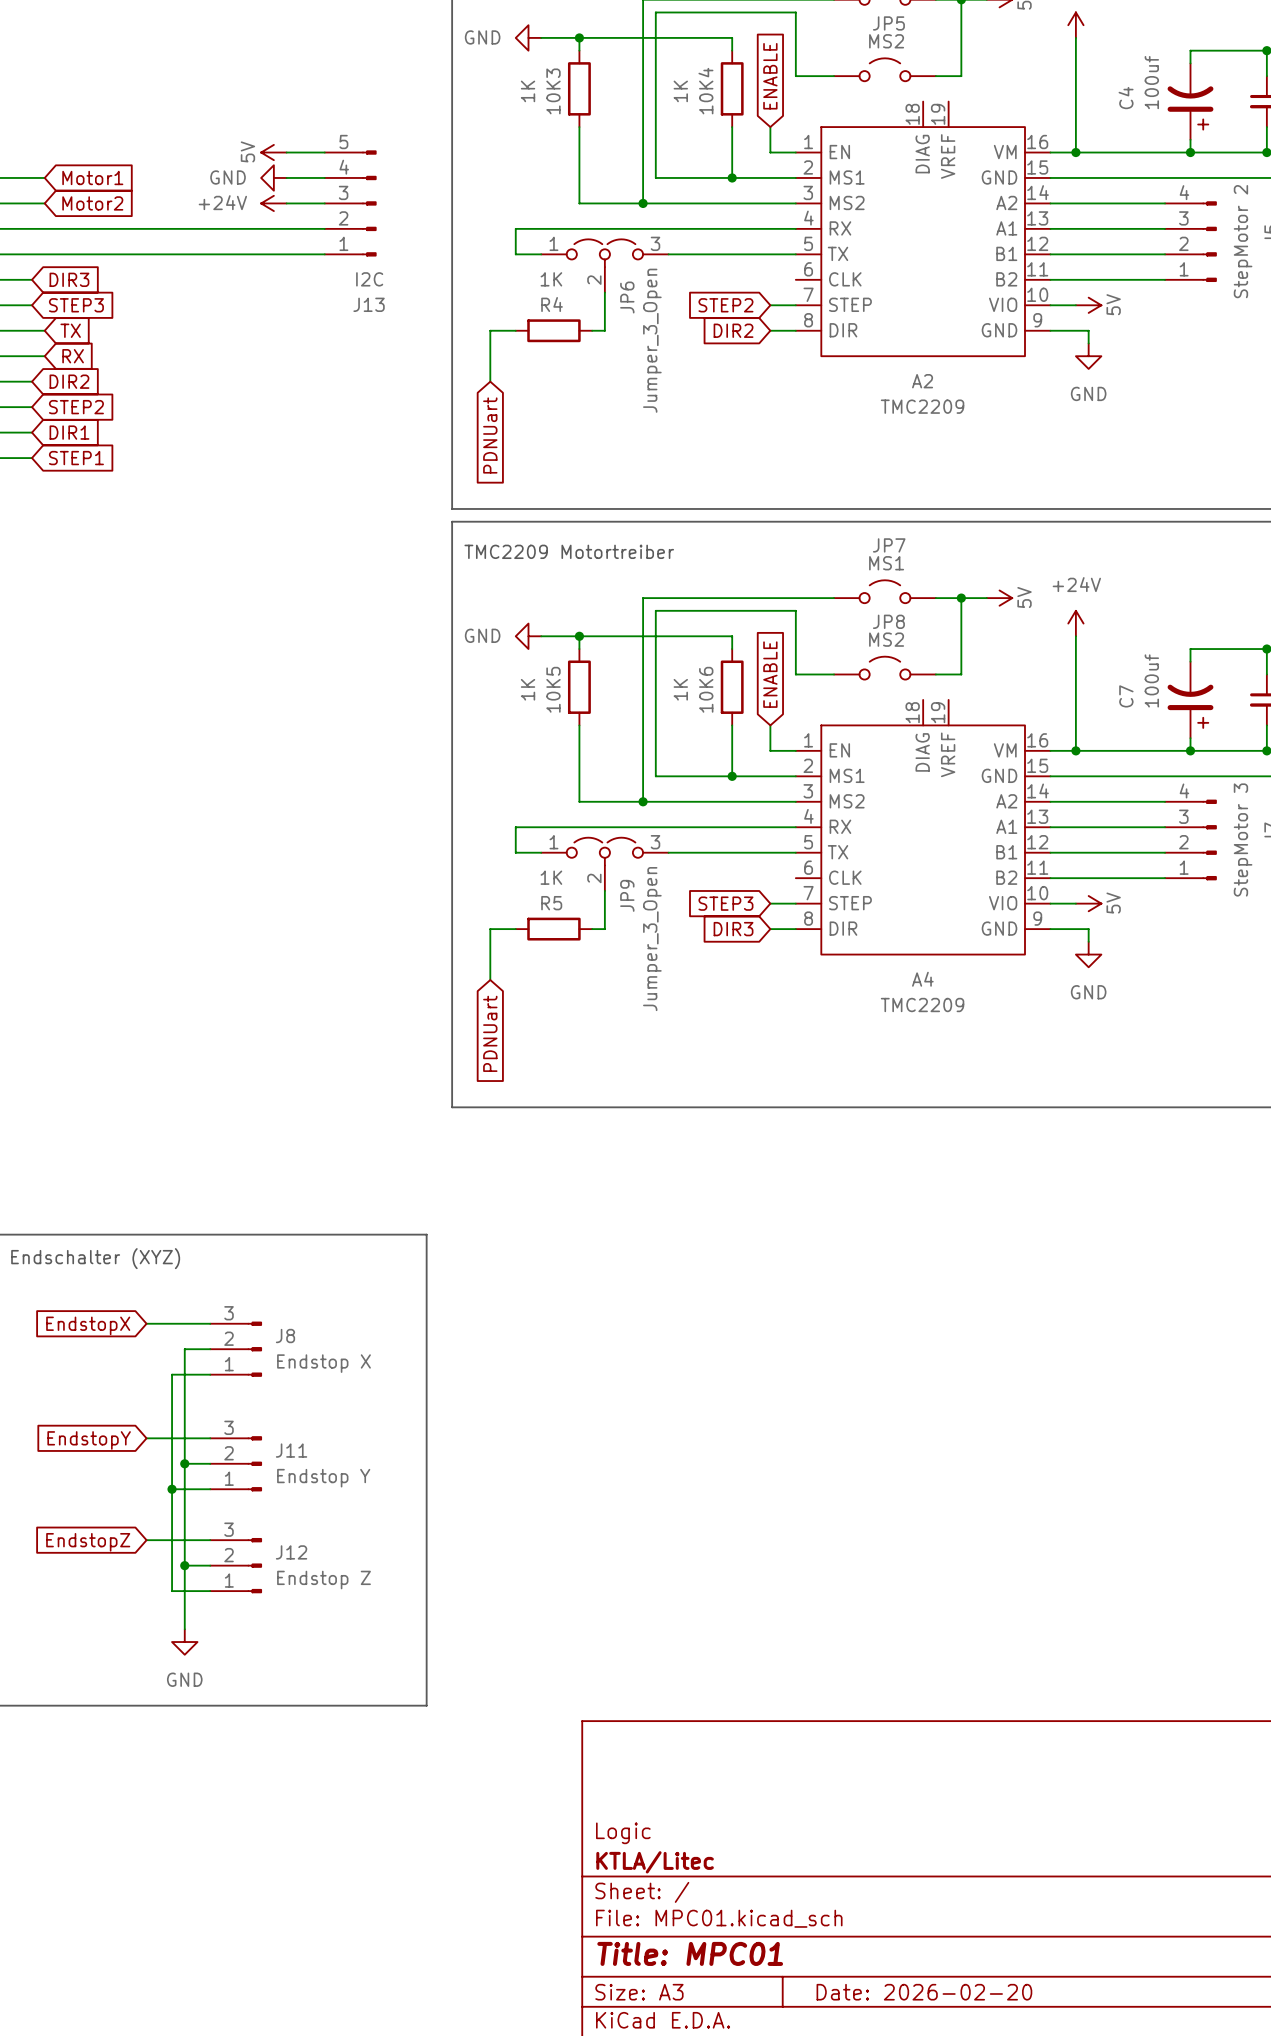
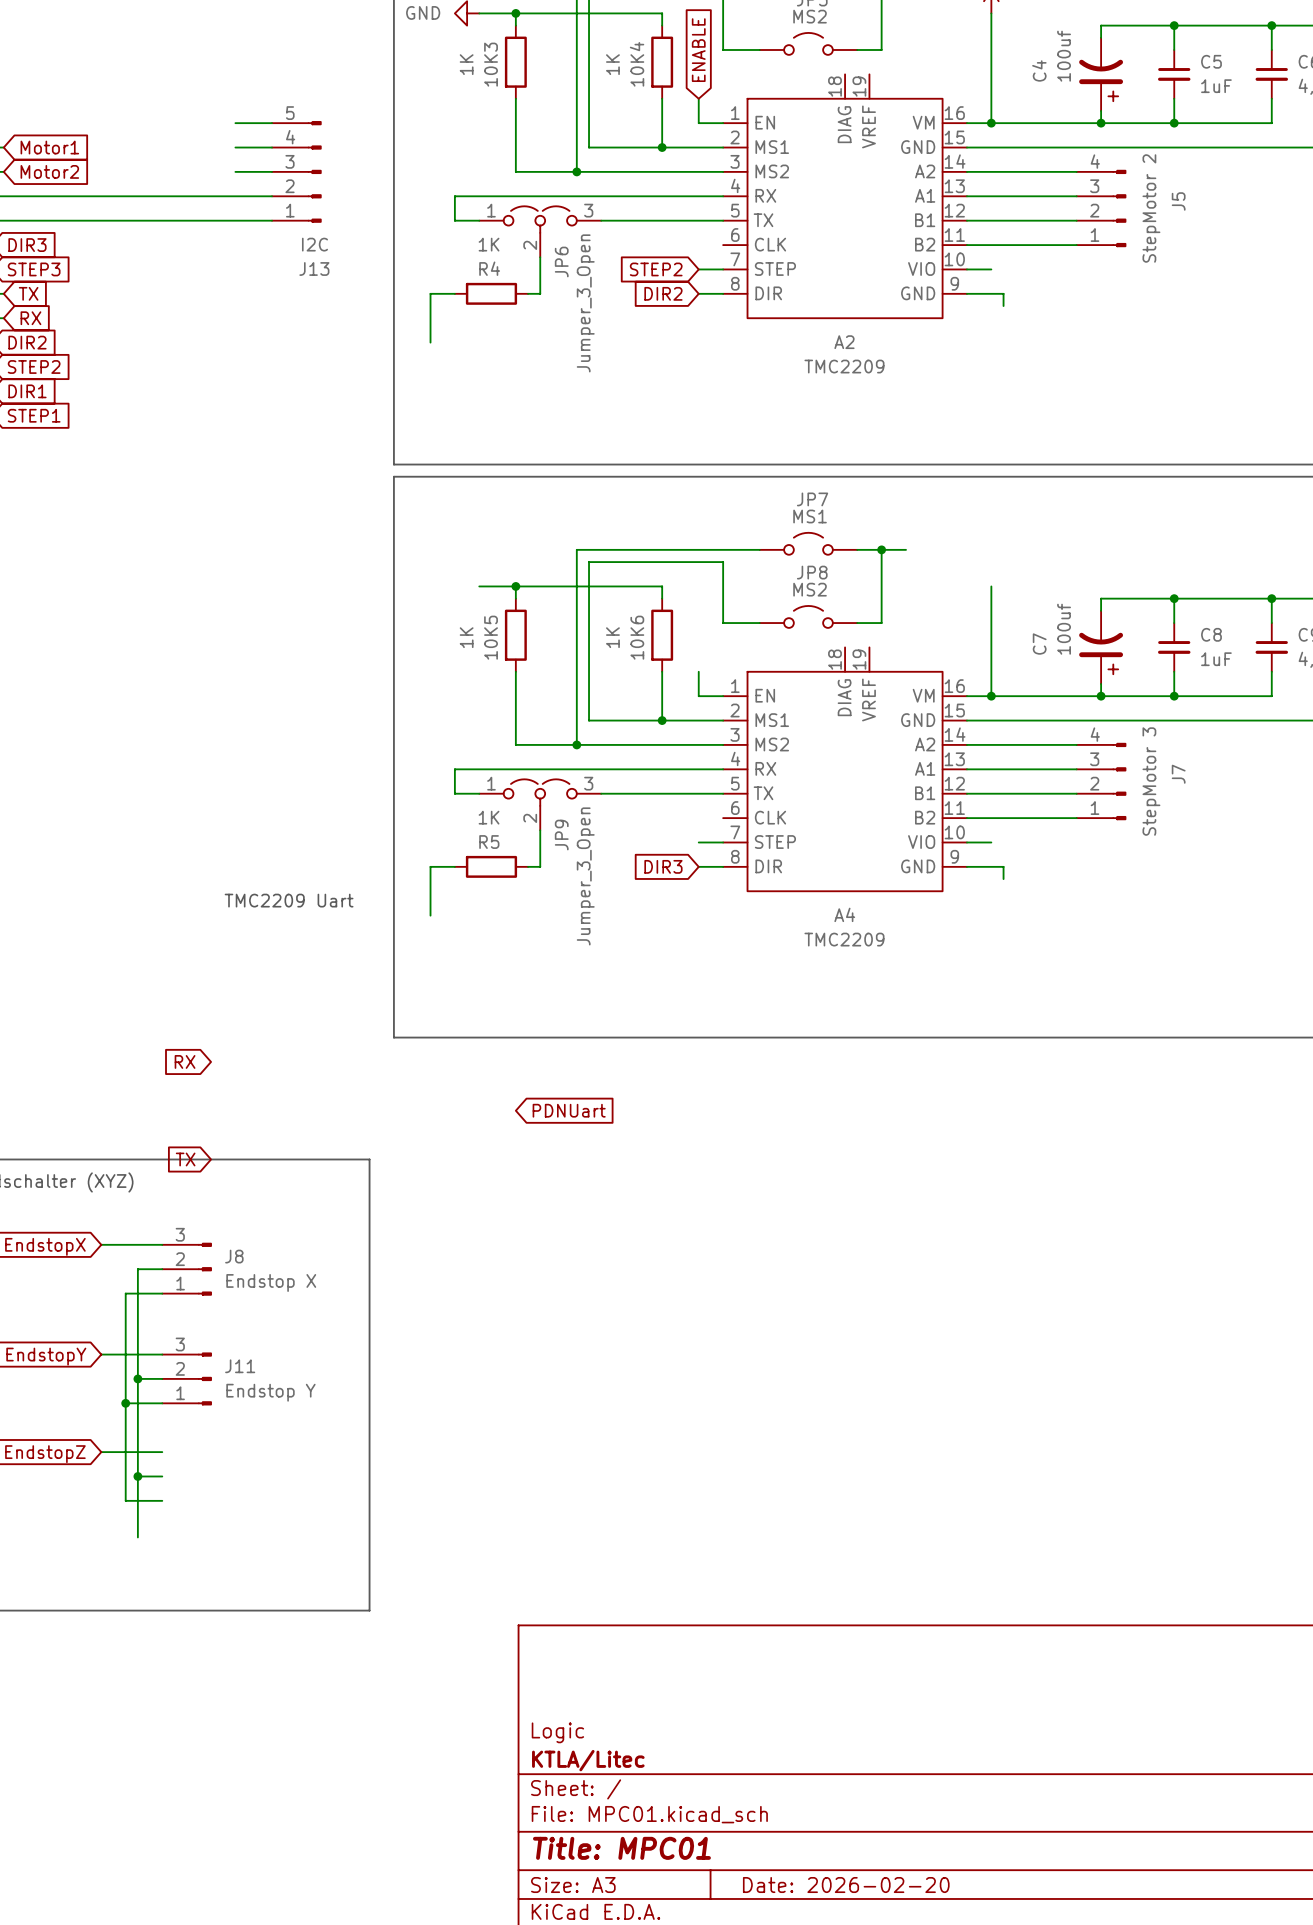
power symbol: 5V (273, 152) -> none
power symbol: GND (273, 177) -> none
power symbol: +24V (273, 203) -> none
power symbol: 5V (1088, 305) -> none
power symbol: GND (1088, 356) -> none
global label: PDNUart (490, 435) -> none
text: TMC2209 Motortreiber (569, 551) -> none
power symbol: 5V (999, 598) -> none
power symbol: +24V (1075, 623) -> none
power symbol: GND (528, 636) -> none
global label: ENABLE (770, 674) -> none
global label: STEP3 (725, 903) -> none
power symbol: 5V (1088, 903) -> none
power symbol: GND (1088, 954) -> none
text: none -> TMC2209 Uart (289, 900)
global label rotation: 0° (490, 1033) -> 90° counterclockwise (569, 1110)
global label position: PDNUart (490, 1033) -> PDNUart (569, 1110)
global label: none -> RX (185, 1061)
global label: none -> TX (185, 1159)
J12: Endstop Z (236, 1565) -> none
power symbol: GND (184, 1642) -> none

